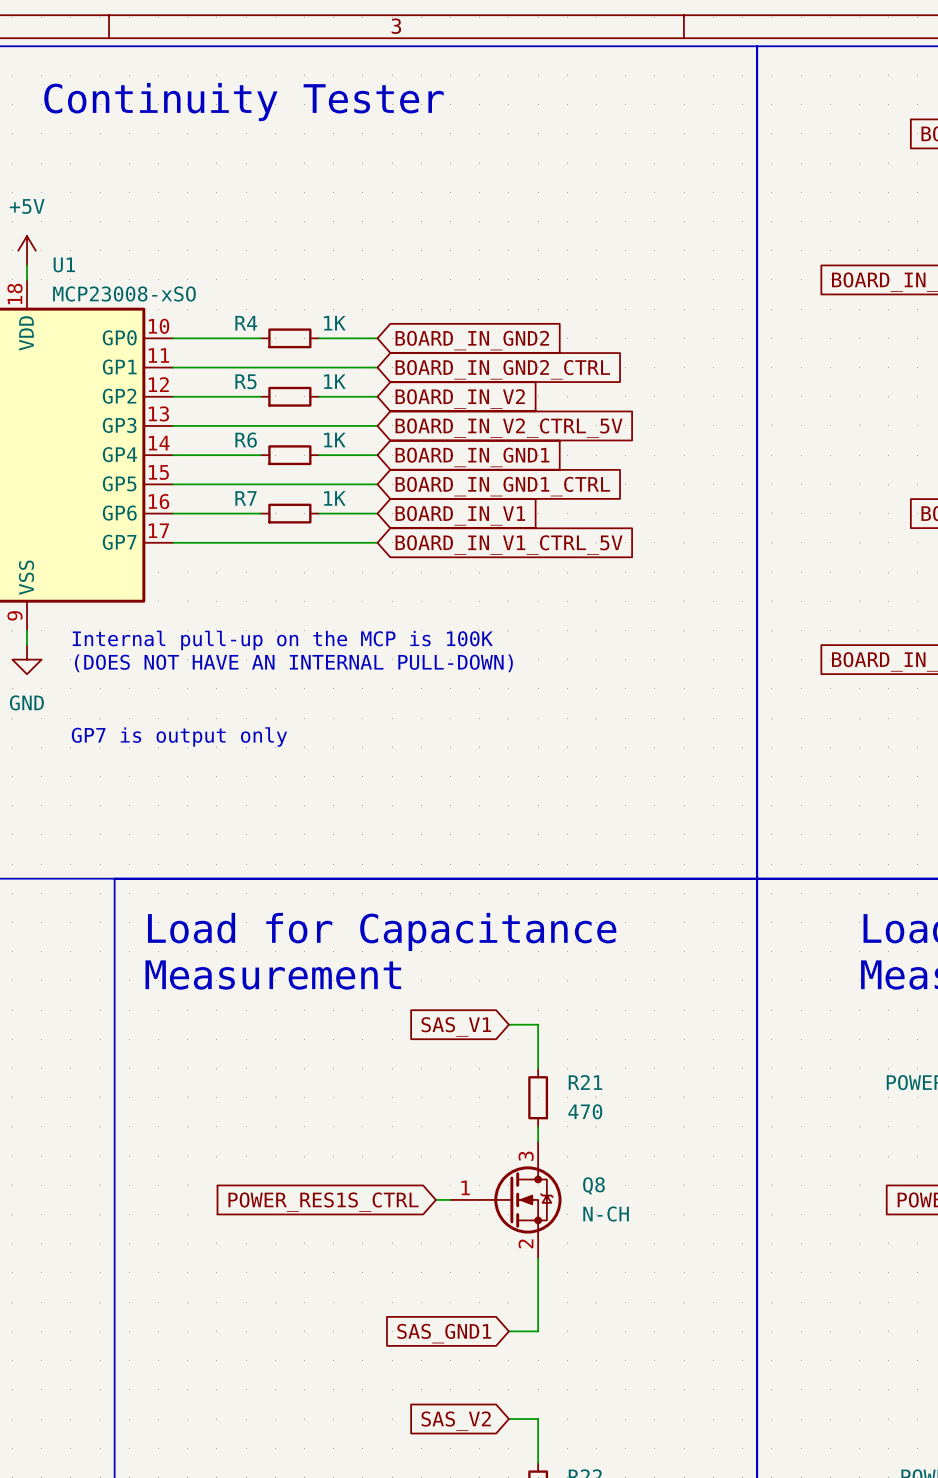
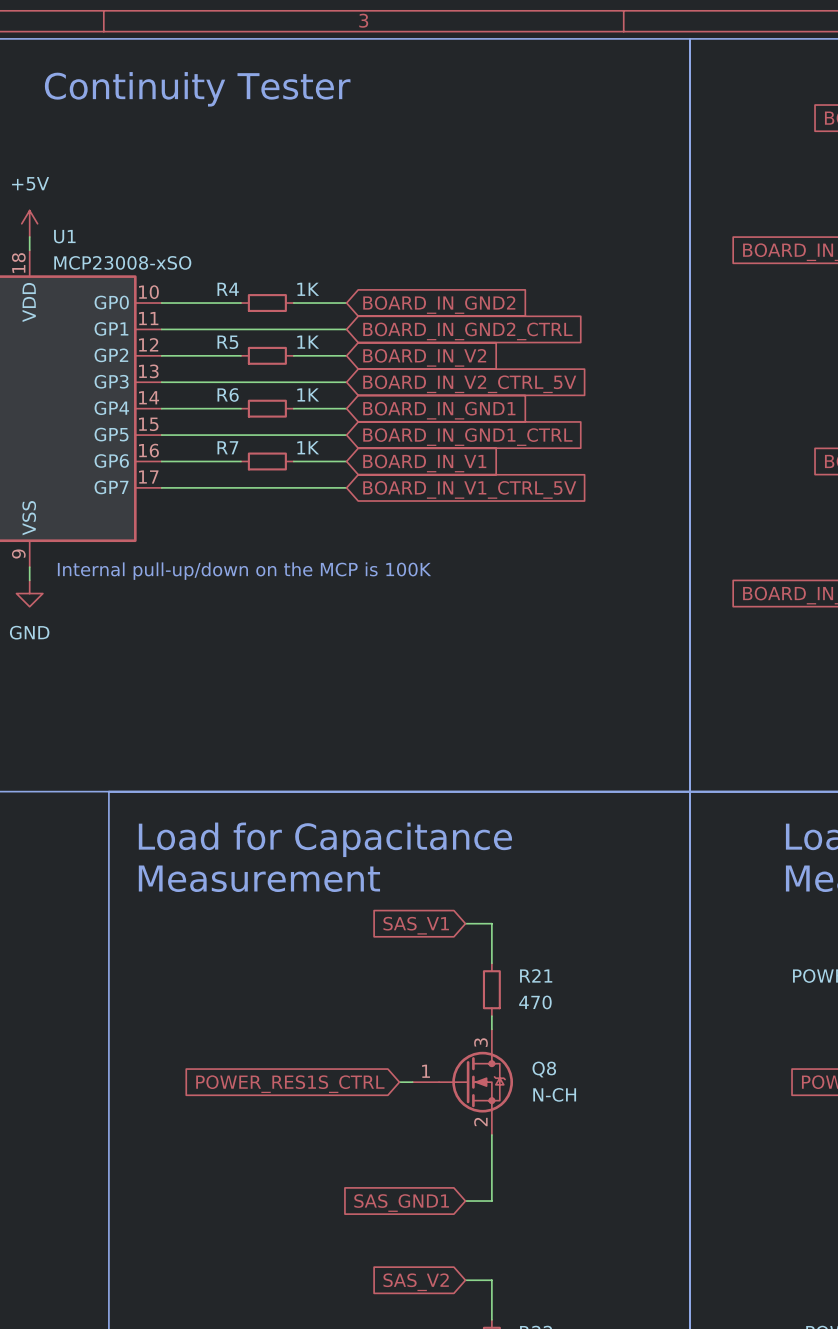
text: Internal pull-up on the MCP is 100K (282, 640) -> Internal pull-up/down on the MCP is 100K (244, 571)
text: (DOES NOT HAVE AN INTERNAL PULL-DOWN) (293, 663) -> none
text: GP7 is output only (179, 737) -> none

